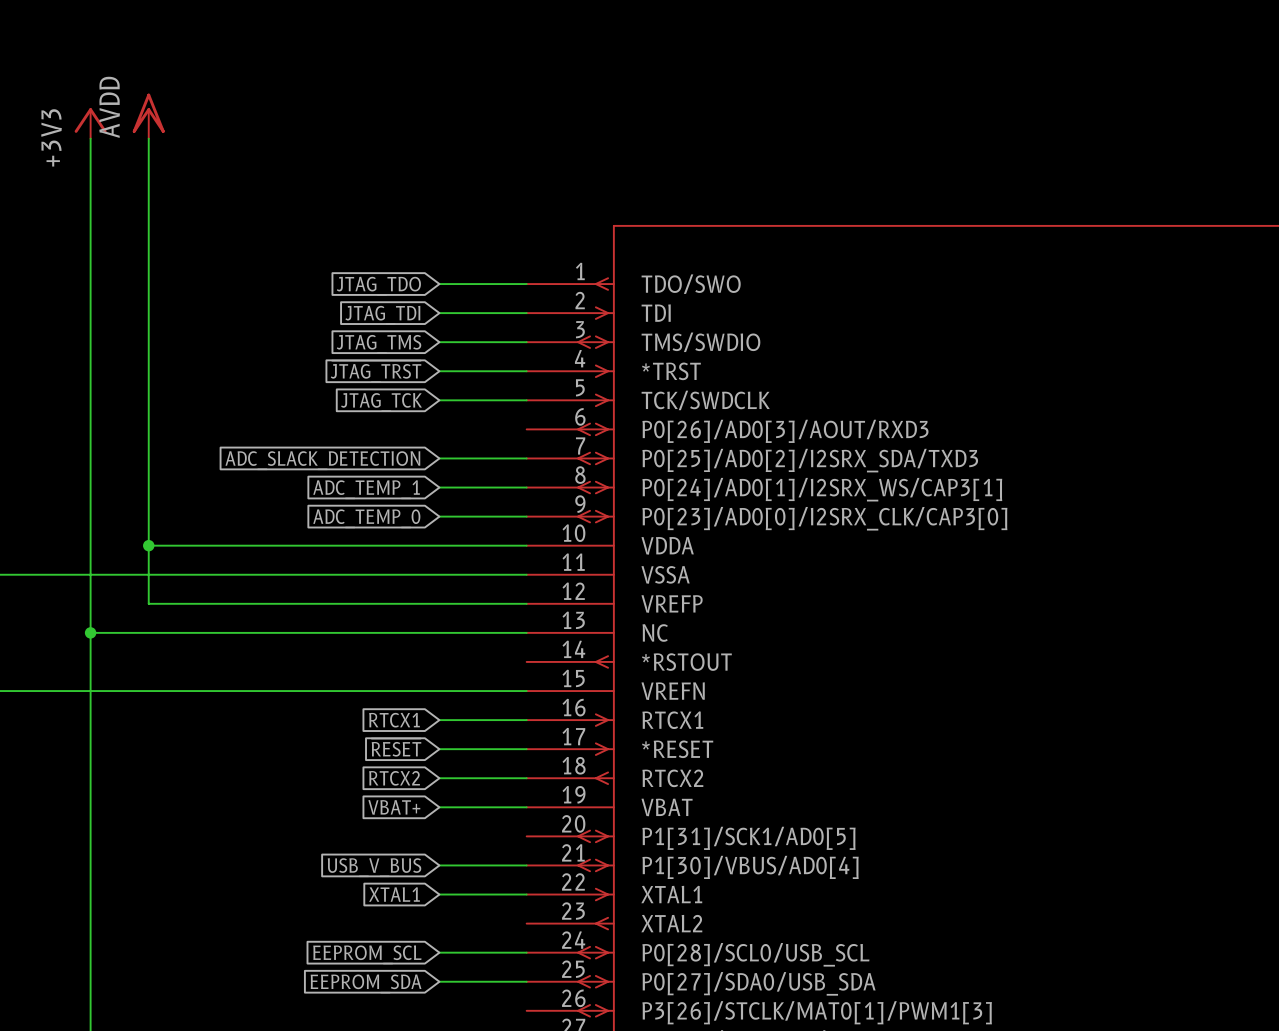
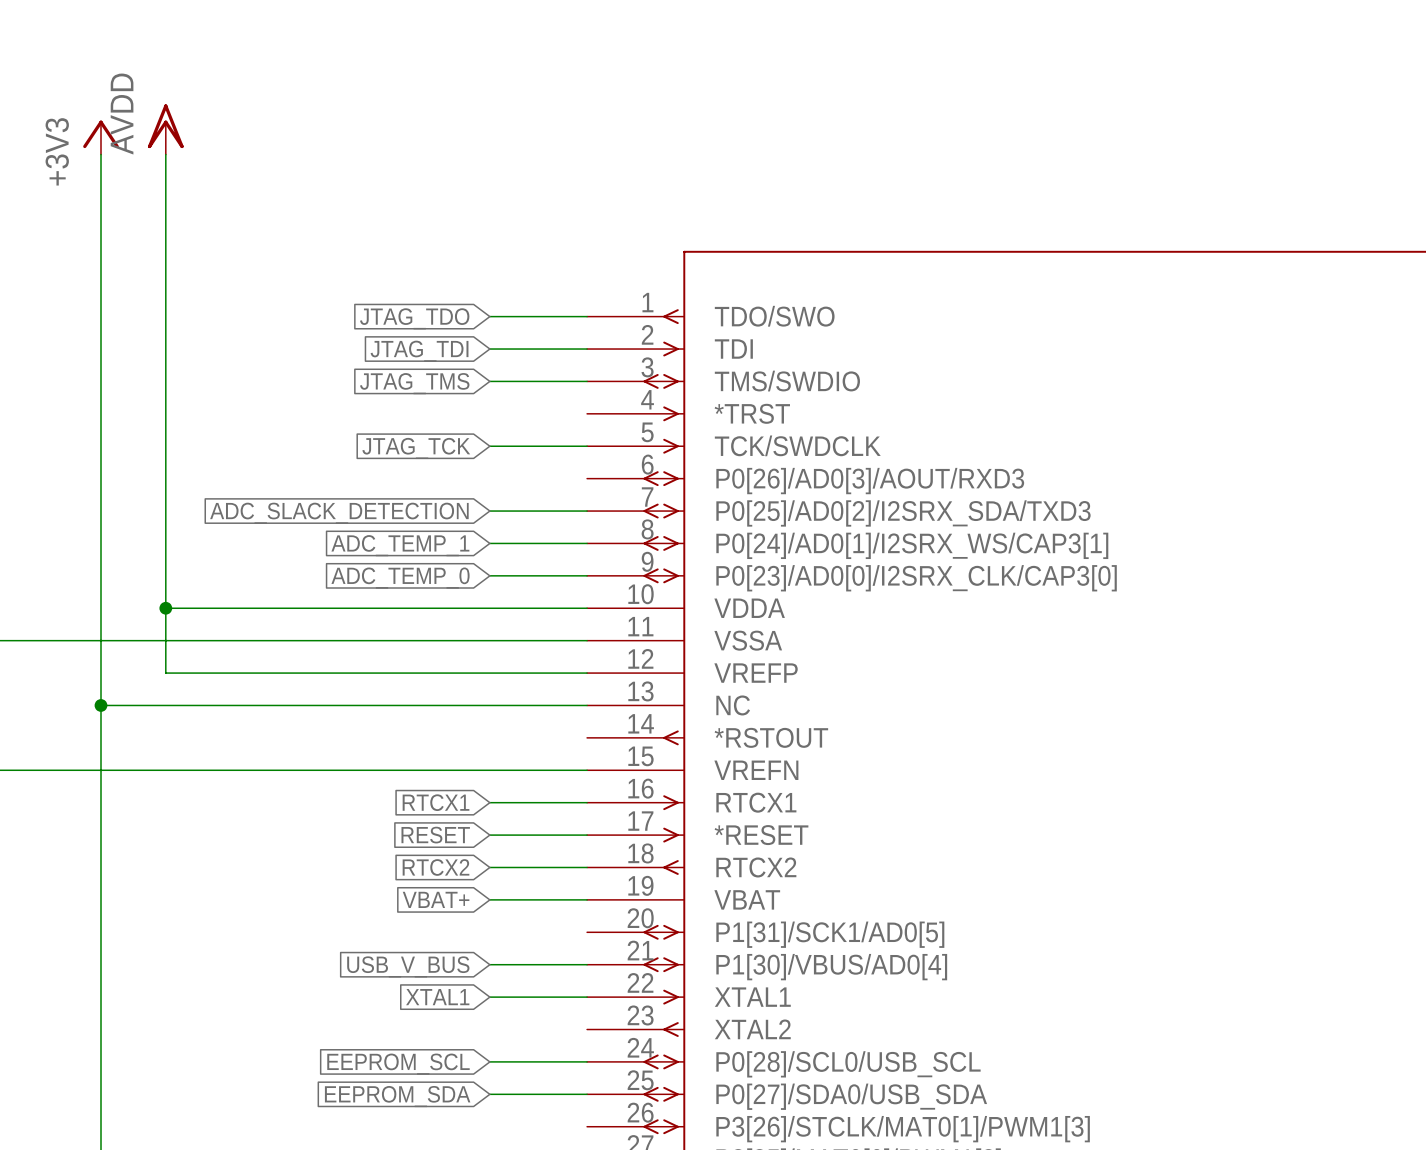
global label: ~{JTAG_TRST} (376, 371) -> none
wire: (439, 371) (526, 371) -> none
global label: ~{RESET} (396, 747) -> RESET (435, 835)

